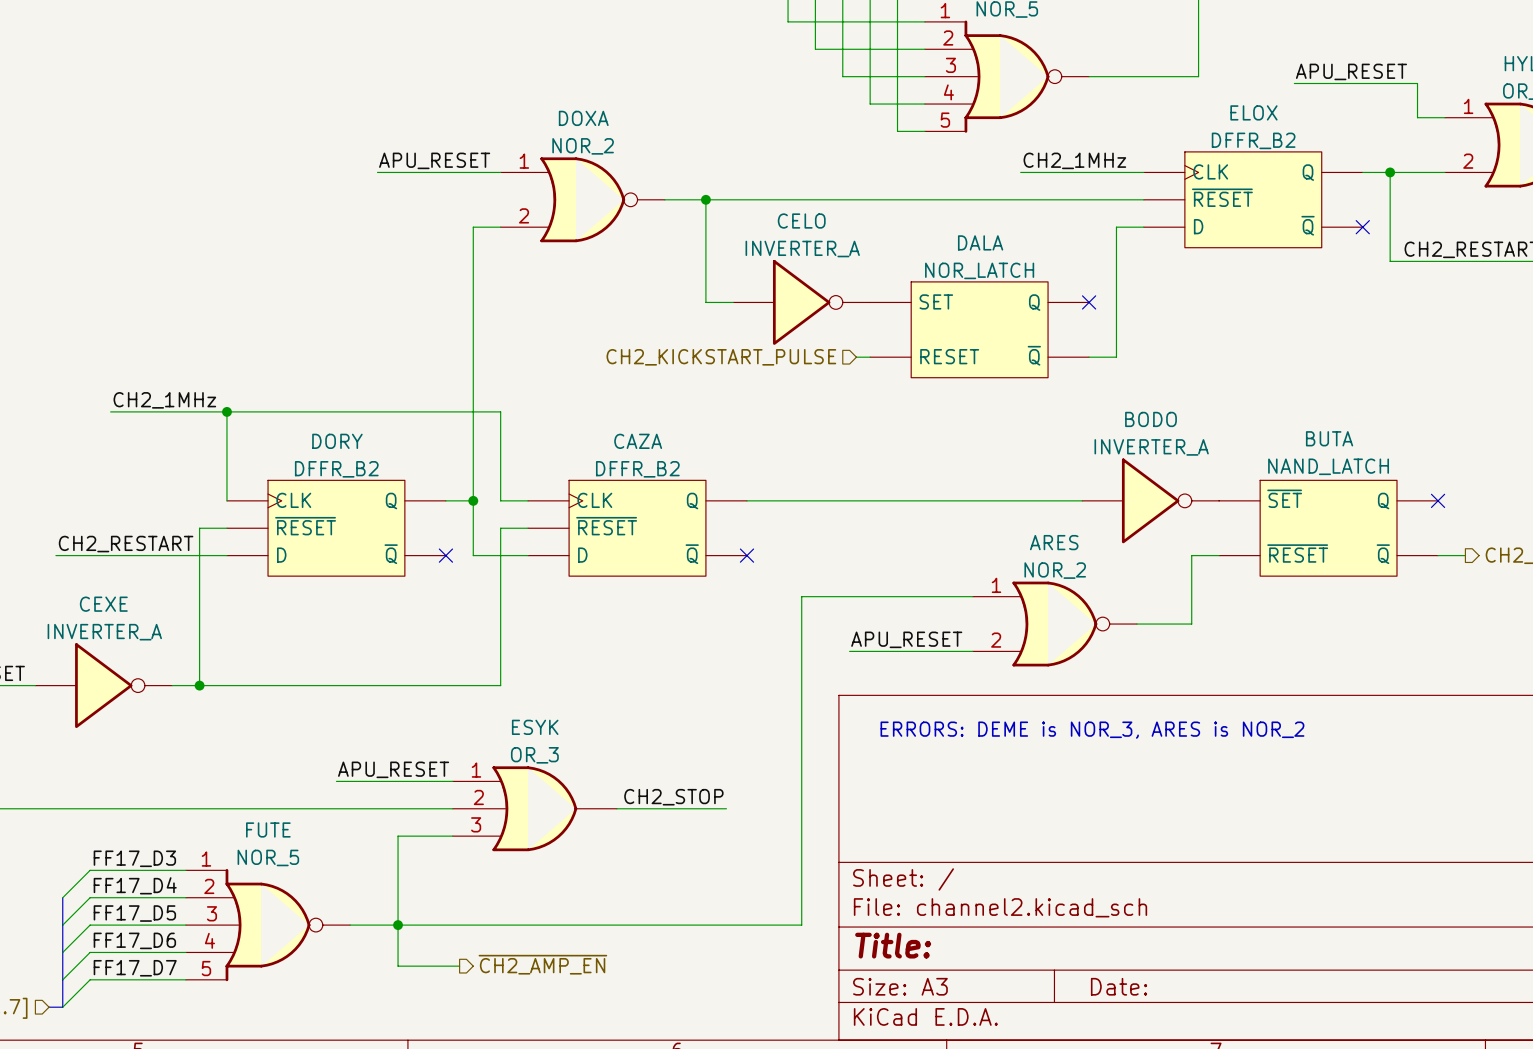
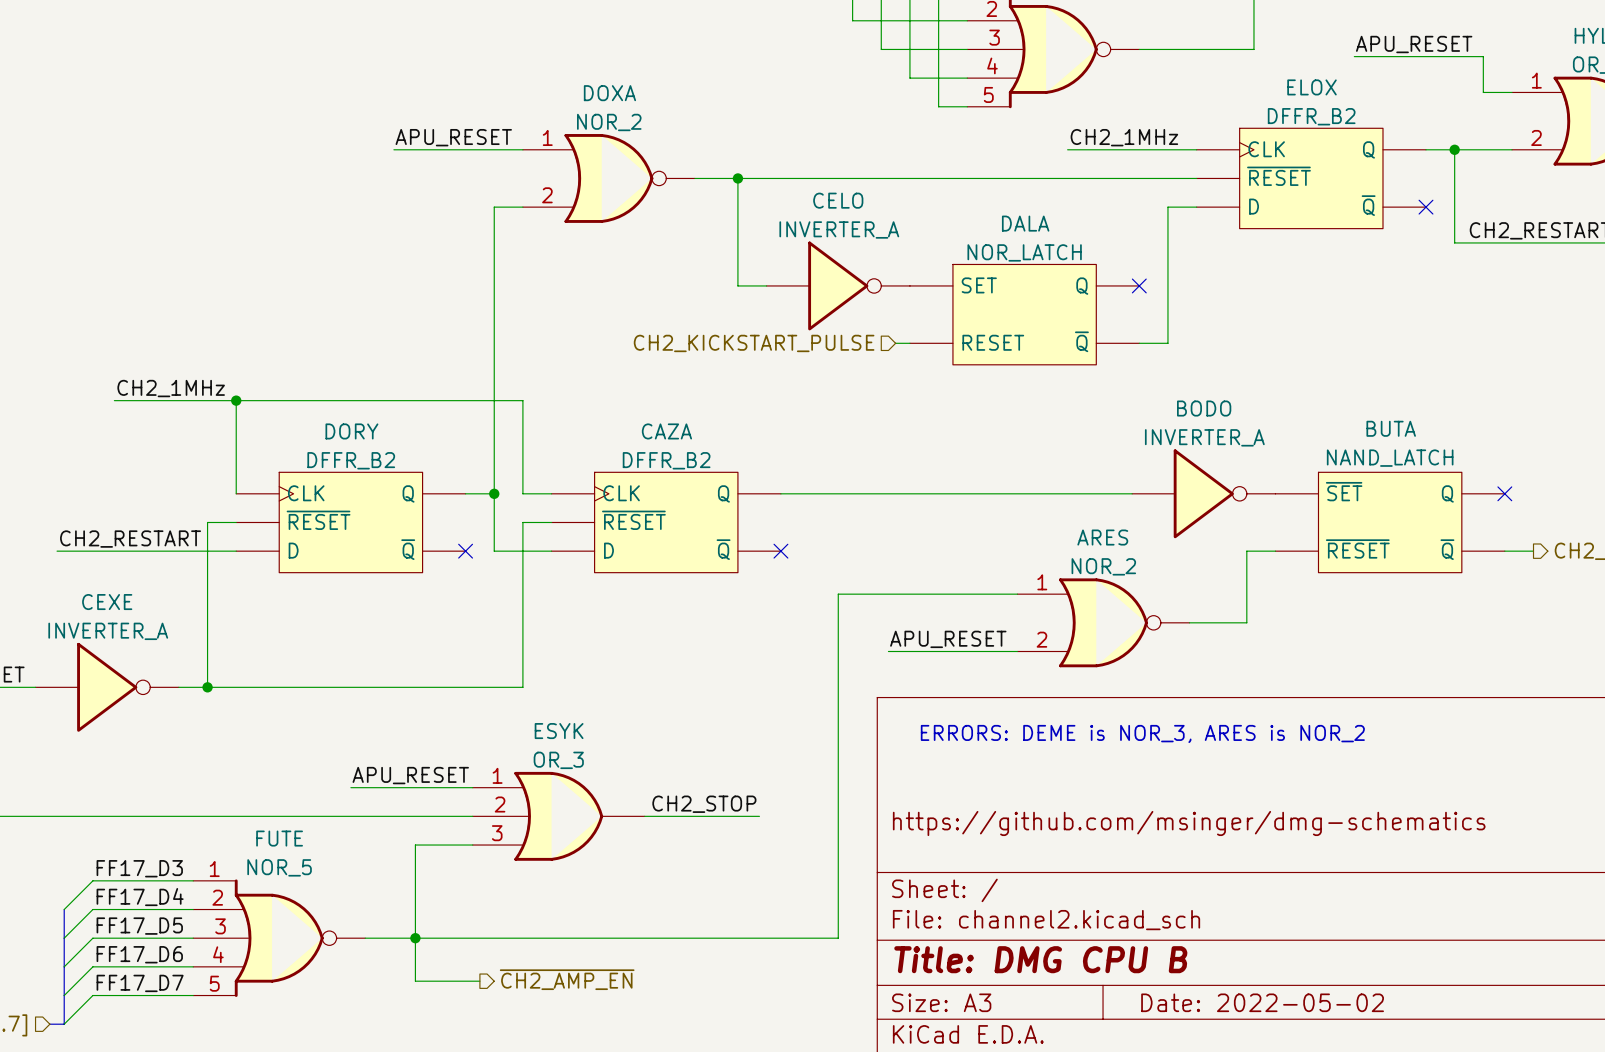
title block: none -> https://github.com/msinger/dmg-schematics (1189, 823)
title block: Title: (893, 945) -> Title: DMG CPU B (1040, 959)
title block: Date: (1119, 986) -> Date: 2022-05-02 (1262, 1002)

